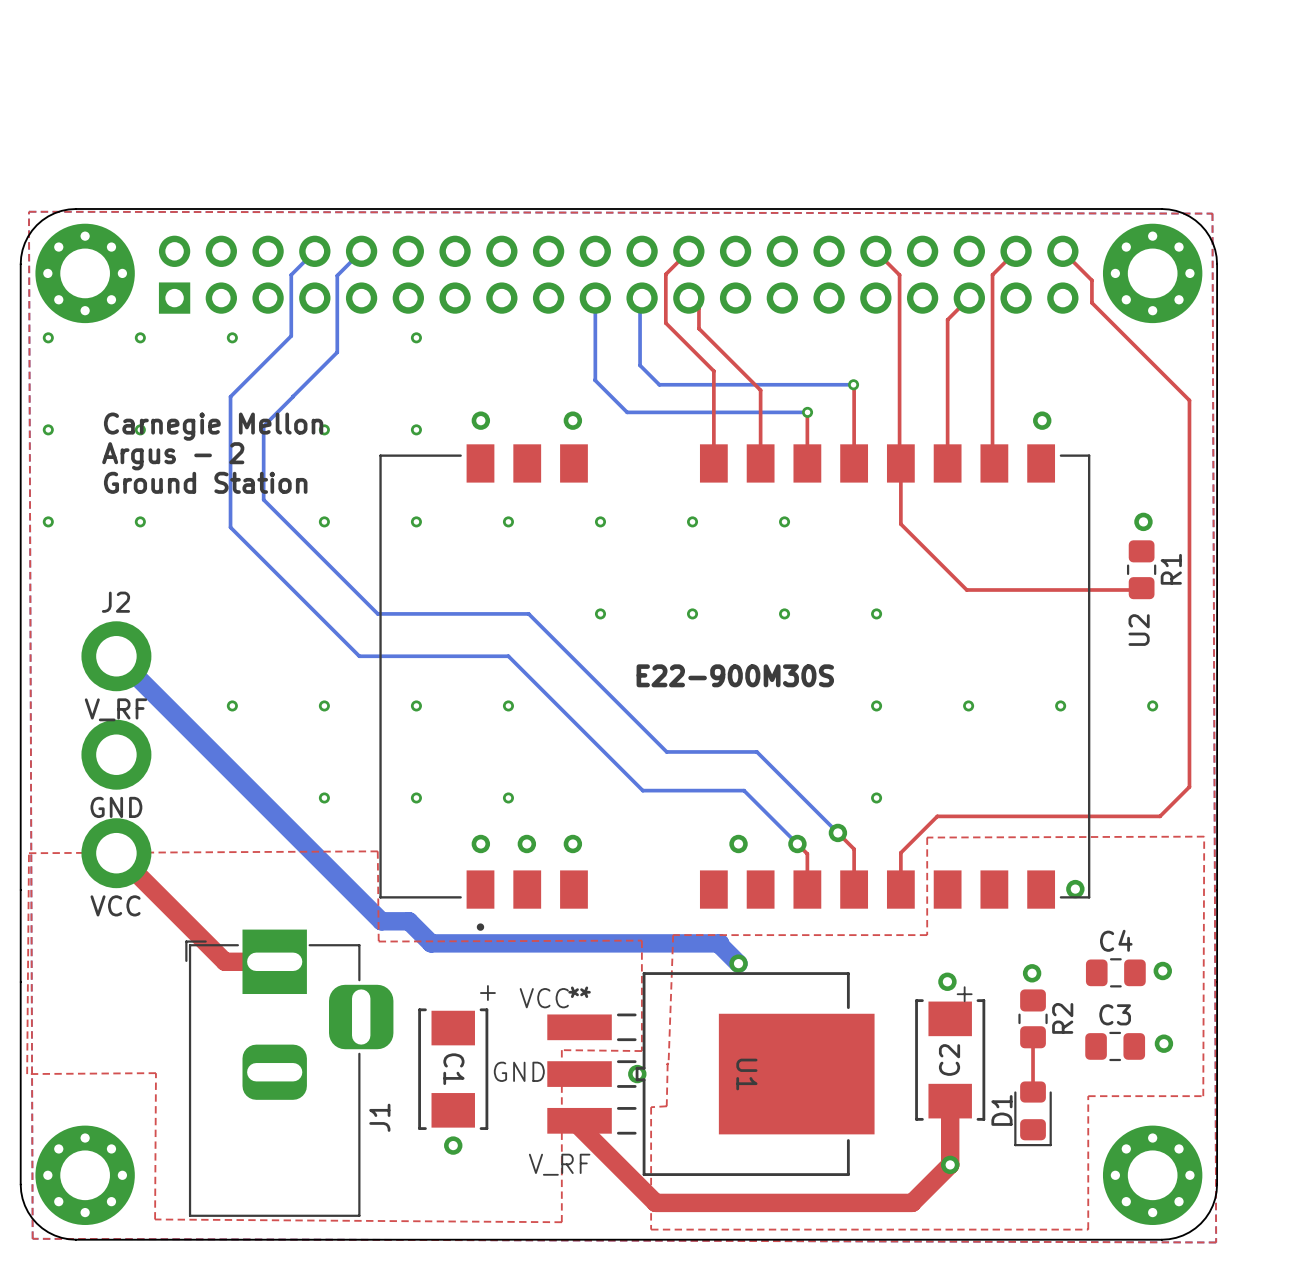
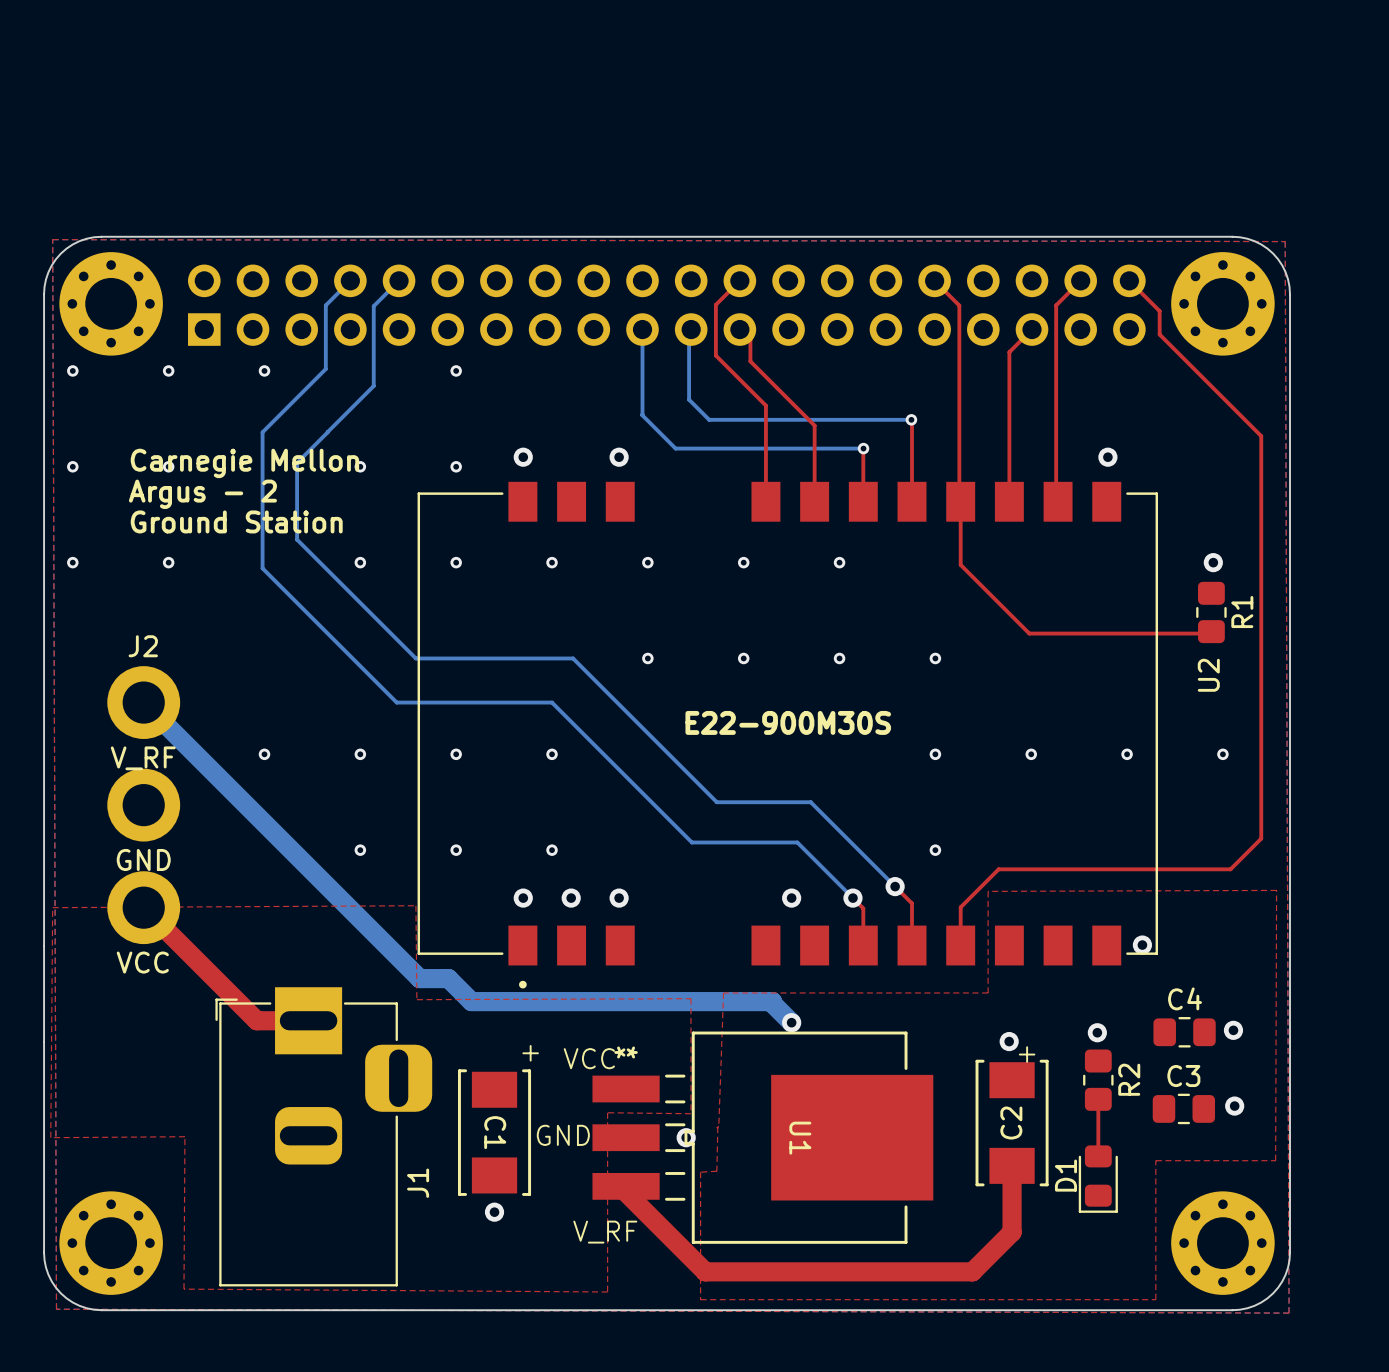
via: (950, 1164) -> none

